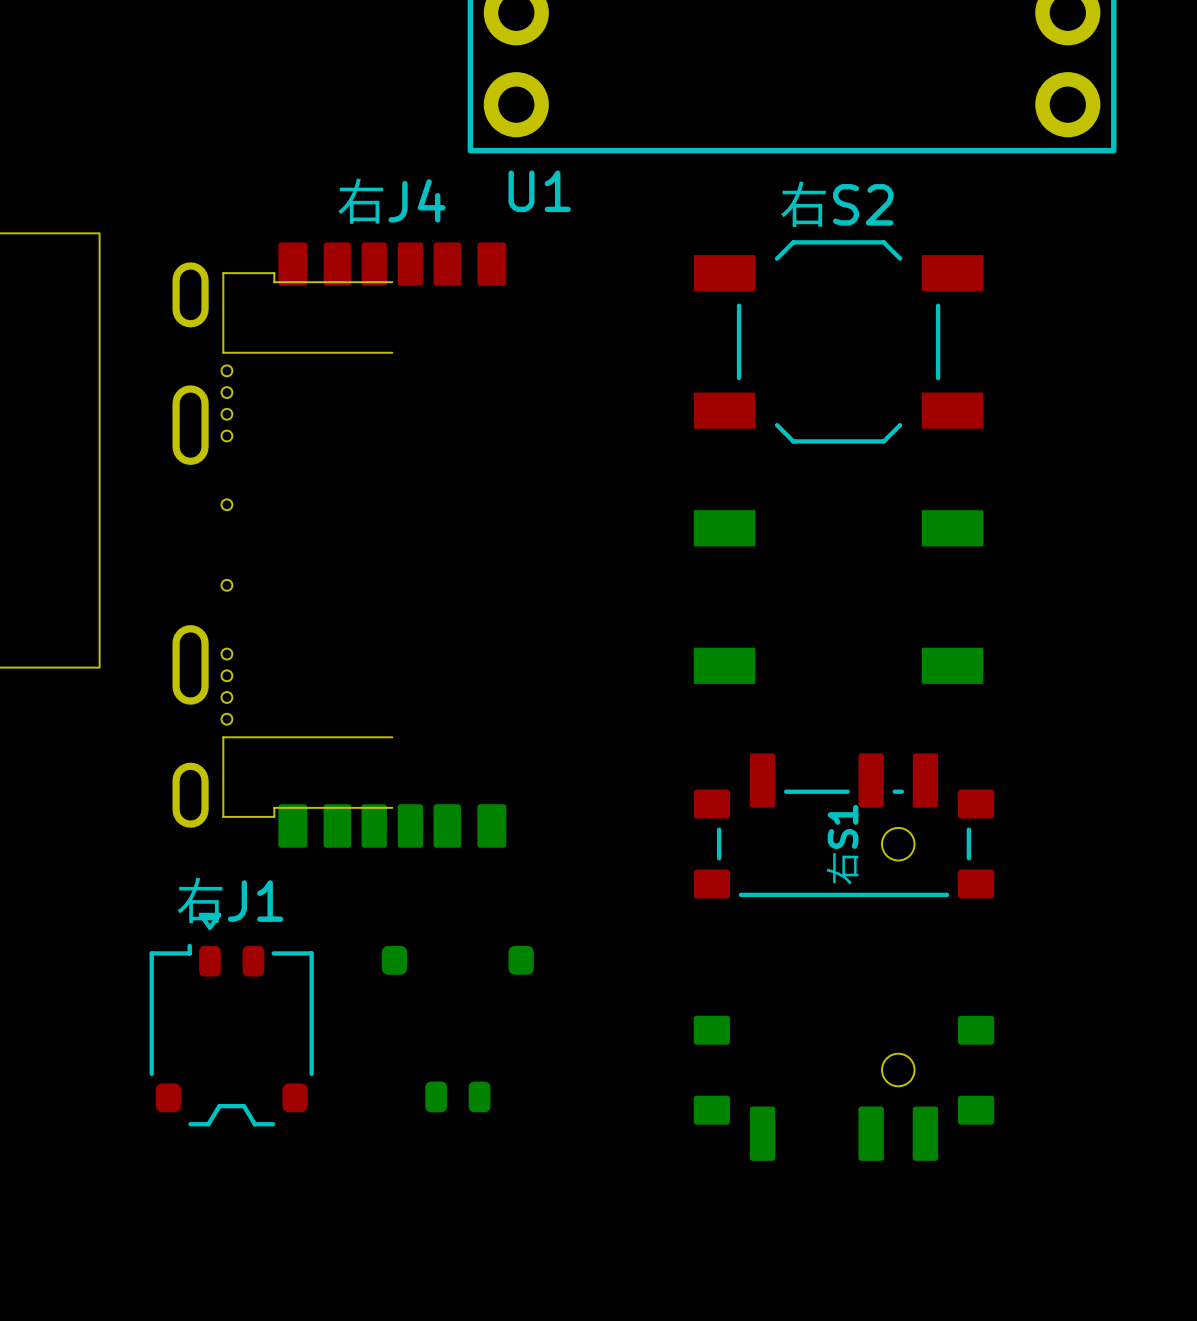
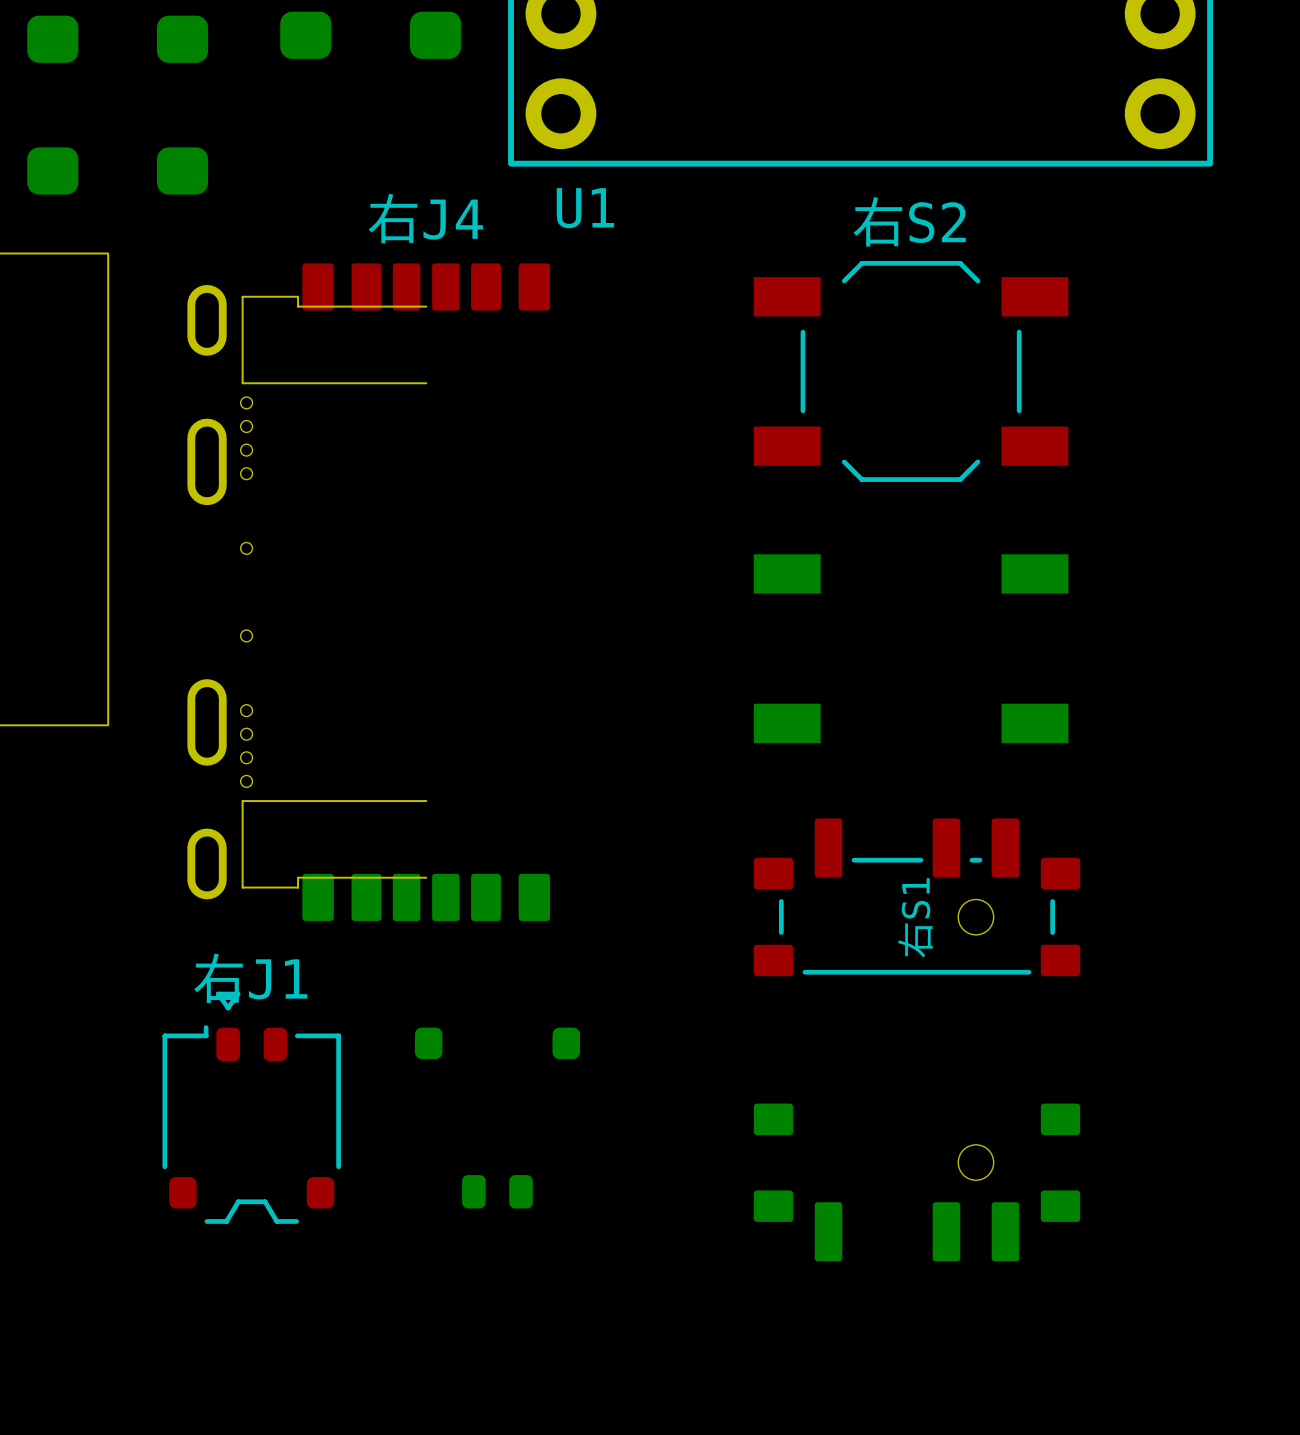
part: none -> (370, 35)
part: none -> (117, 39)
part: none -> (117, 170)

